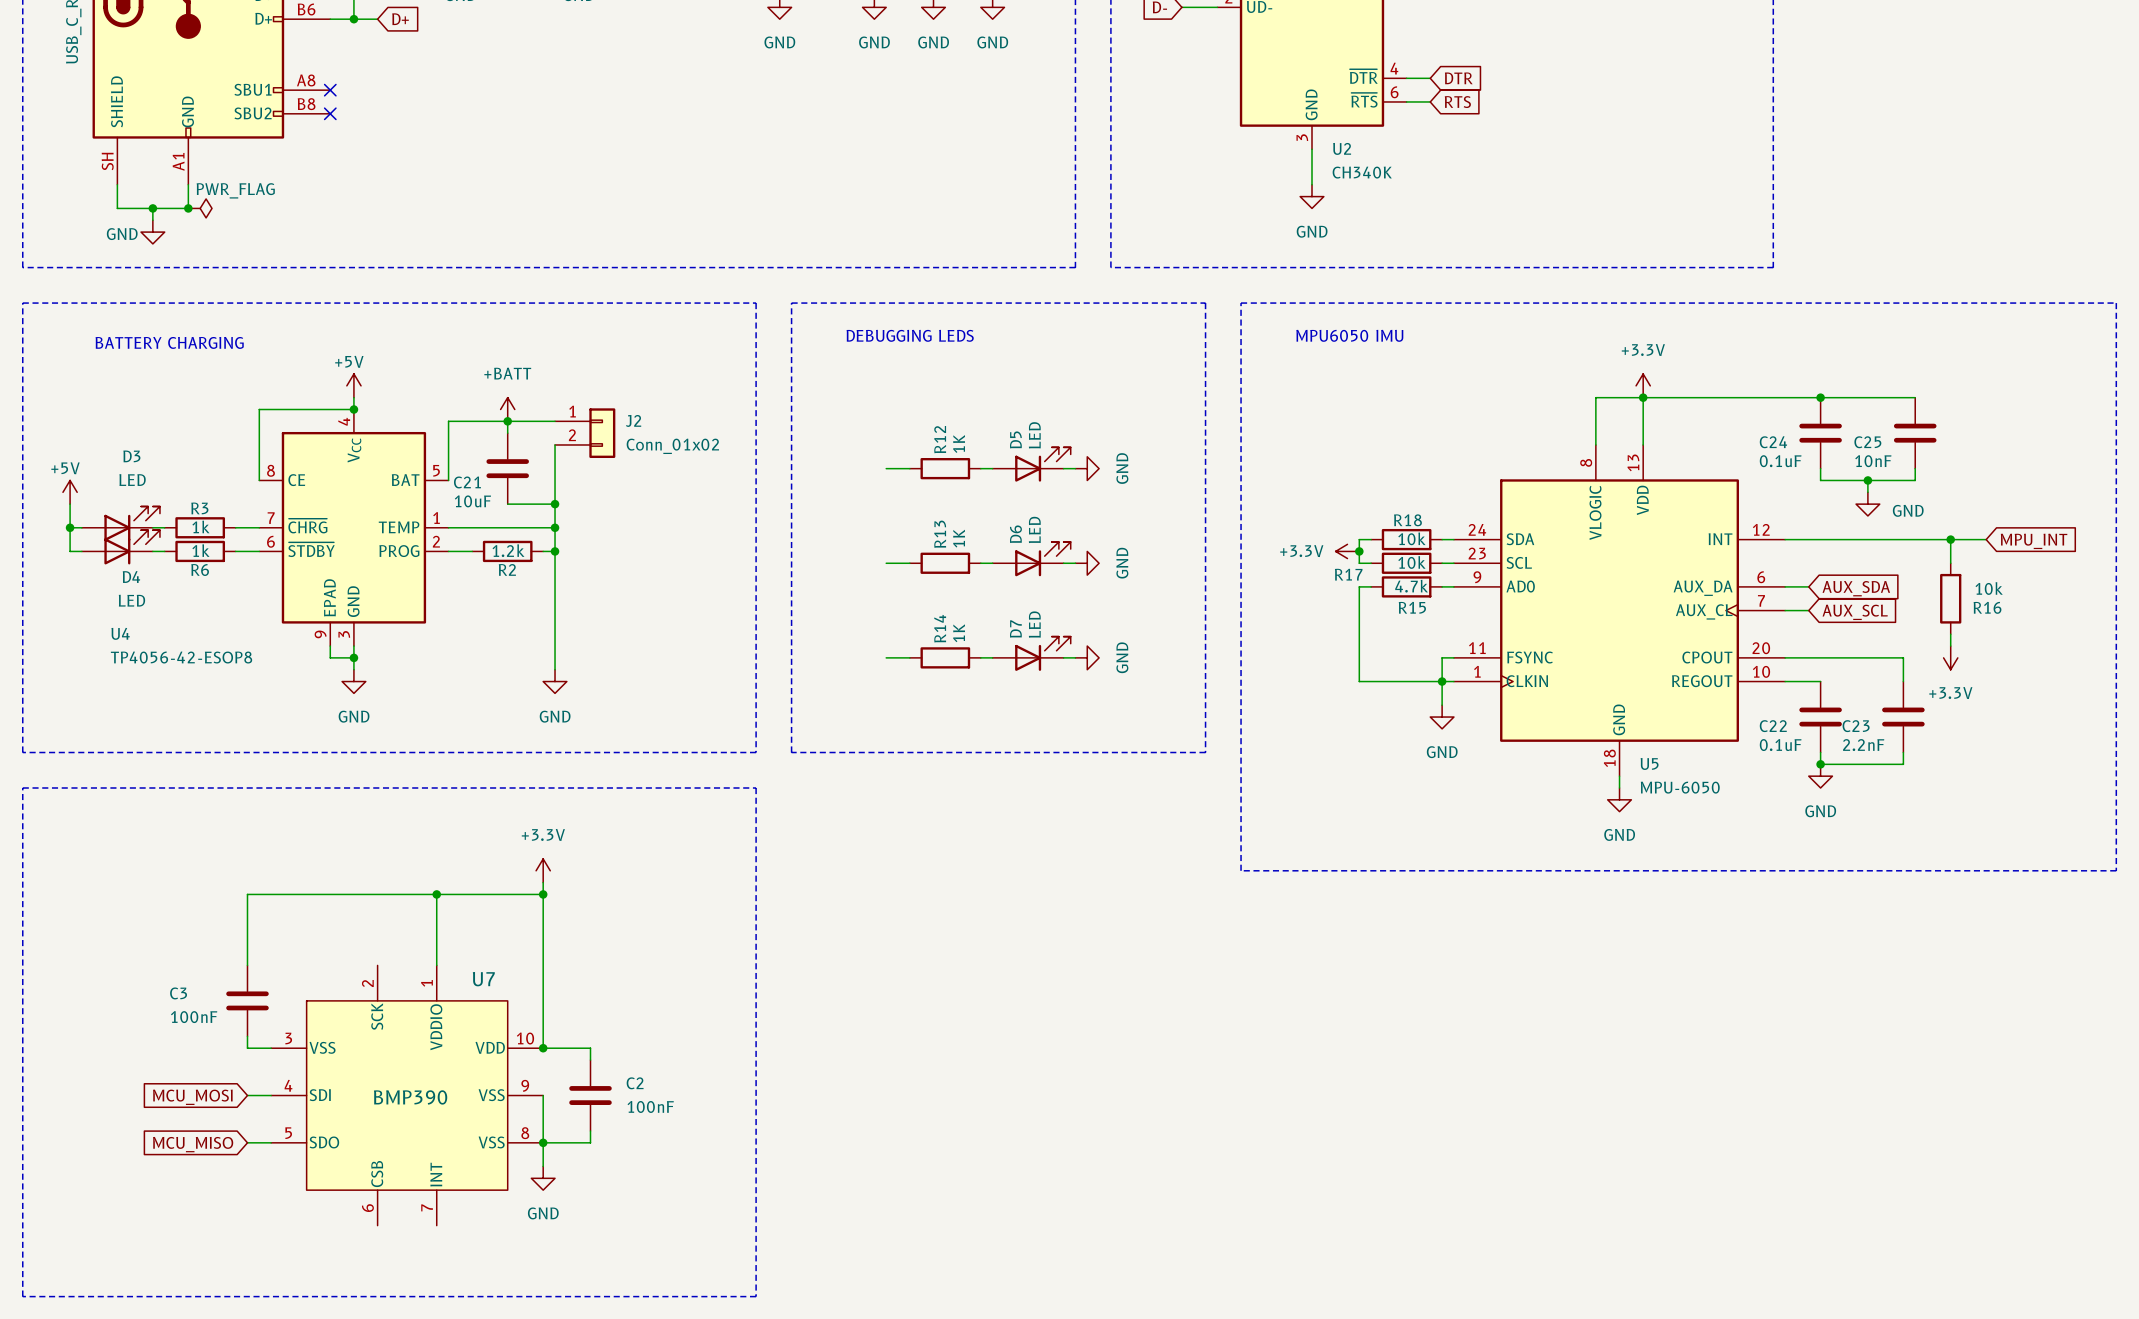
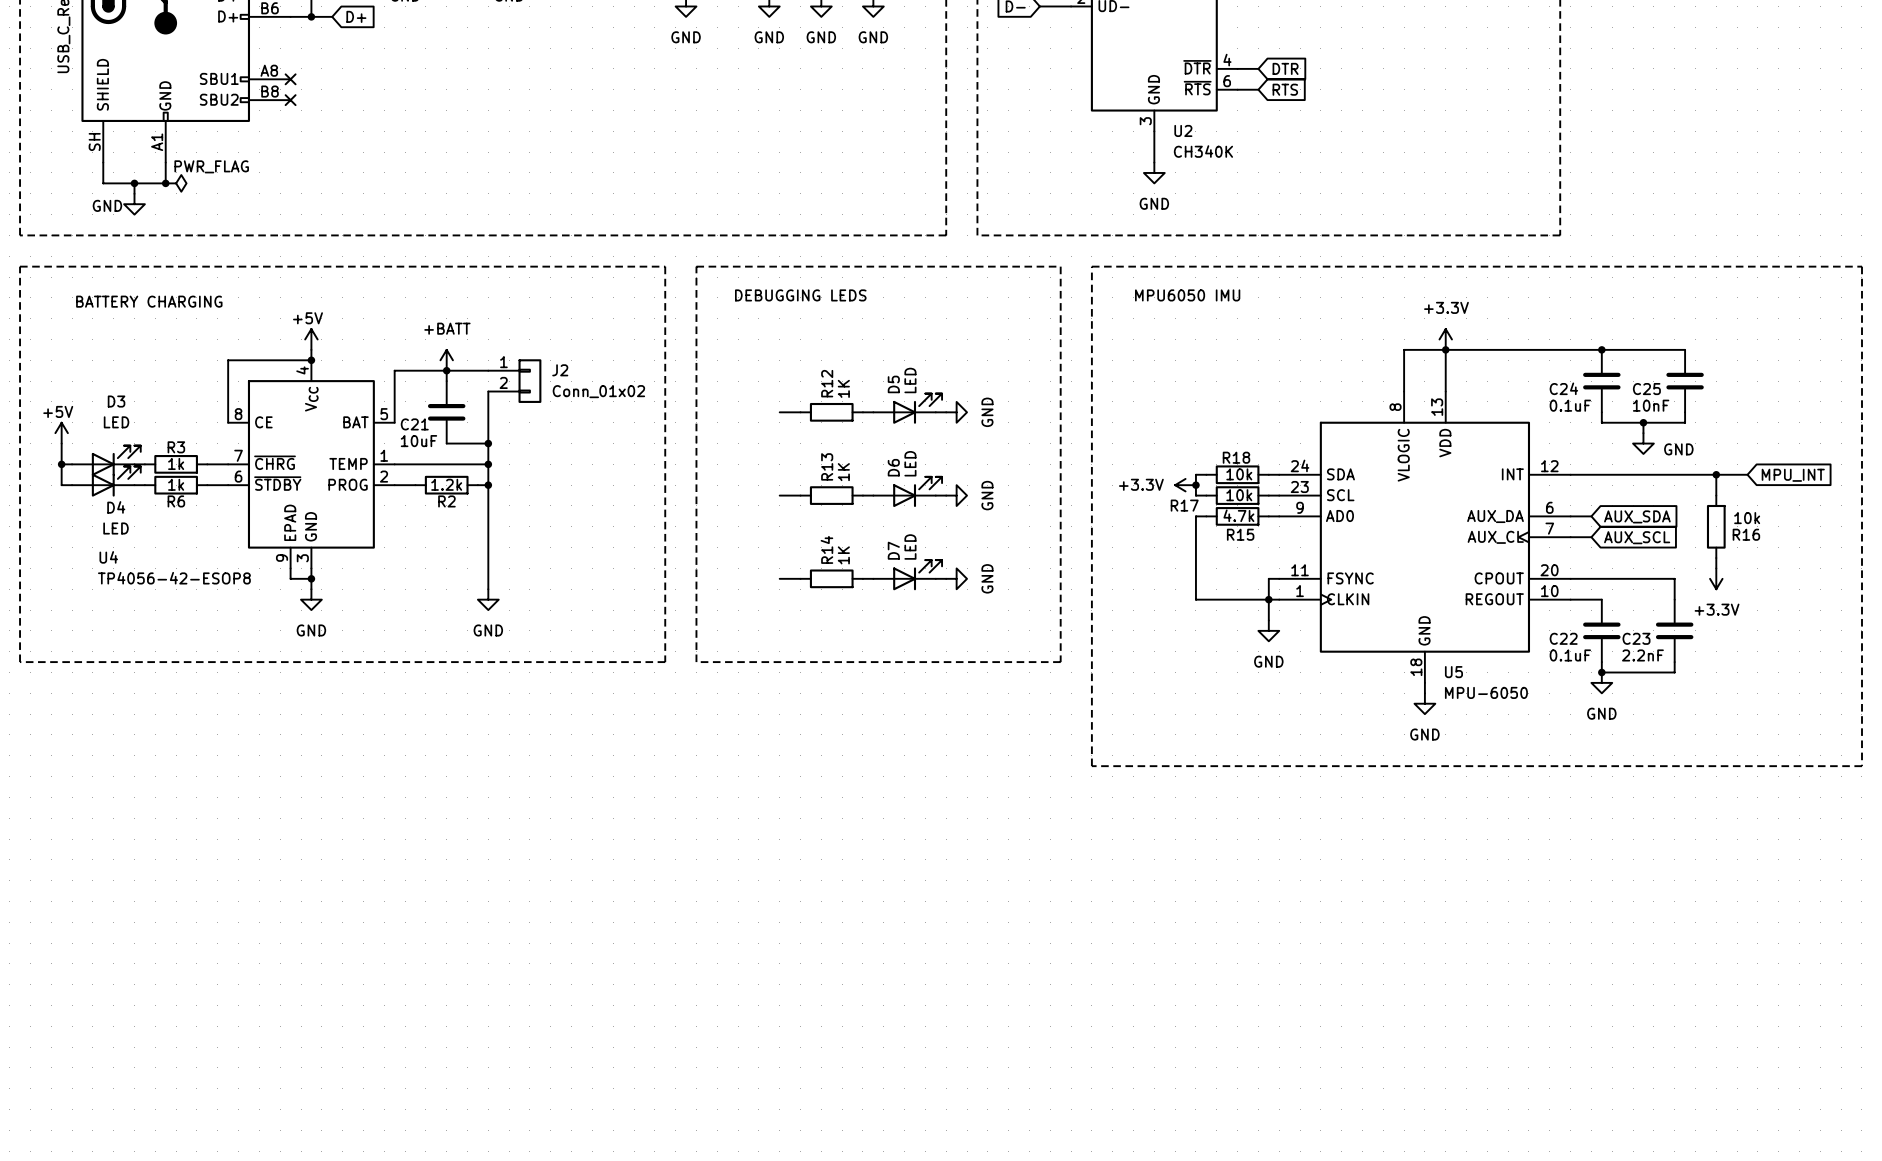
line: (22, 788) (756, 788) (756, 1296) (22, 1296) (22, 788) -> none
power symbol: +3.3V (543, 870) -> none
wire: (543, 882) (543, 1048) (590, 1048) (590, 1060) -> none
wire: (436, 894) (436, 965) -> none
junction: (436, 894) -> none
wire: (543, 894) (247, 894) (247, 965) -> none
junction: (543, 894) -> none
C3: 100nF (247, 1000) -> none
wire: (247, 1036) (247, 1048) (271, 1048) -> none
junction: (543, 1048) -> none
wire: (247, 1095) (271, 1095) -> none
U7: BMP390 (407, 1095) -> none
wire: (543, 1095) (543, 1166) -> none
C2: 100nF (590, 1095) -> none
global label: MCU_MOSI (192, 1097) -> none
wire: (590, 1131) (590, 1142) (543, 1142) -> none
wire: (247, 1142) (271, 1142) -> none
junction: (543, 1142) -> none
global label: MCU_MISO (193, 1144) -> none
power symbol: GND (543, 1178) -> none

